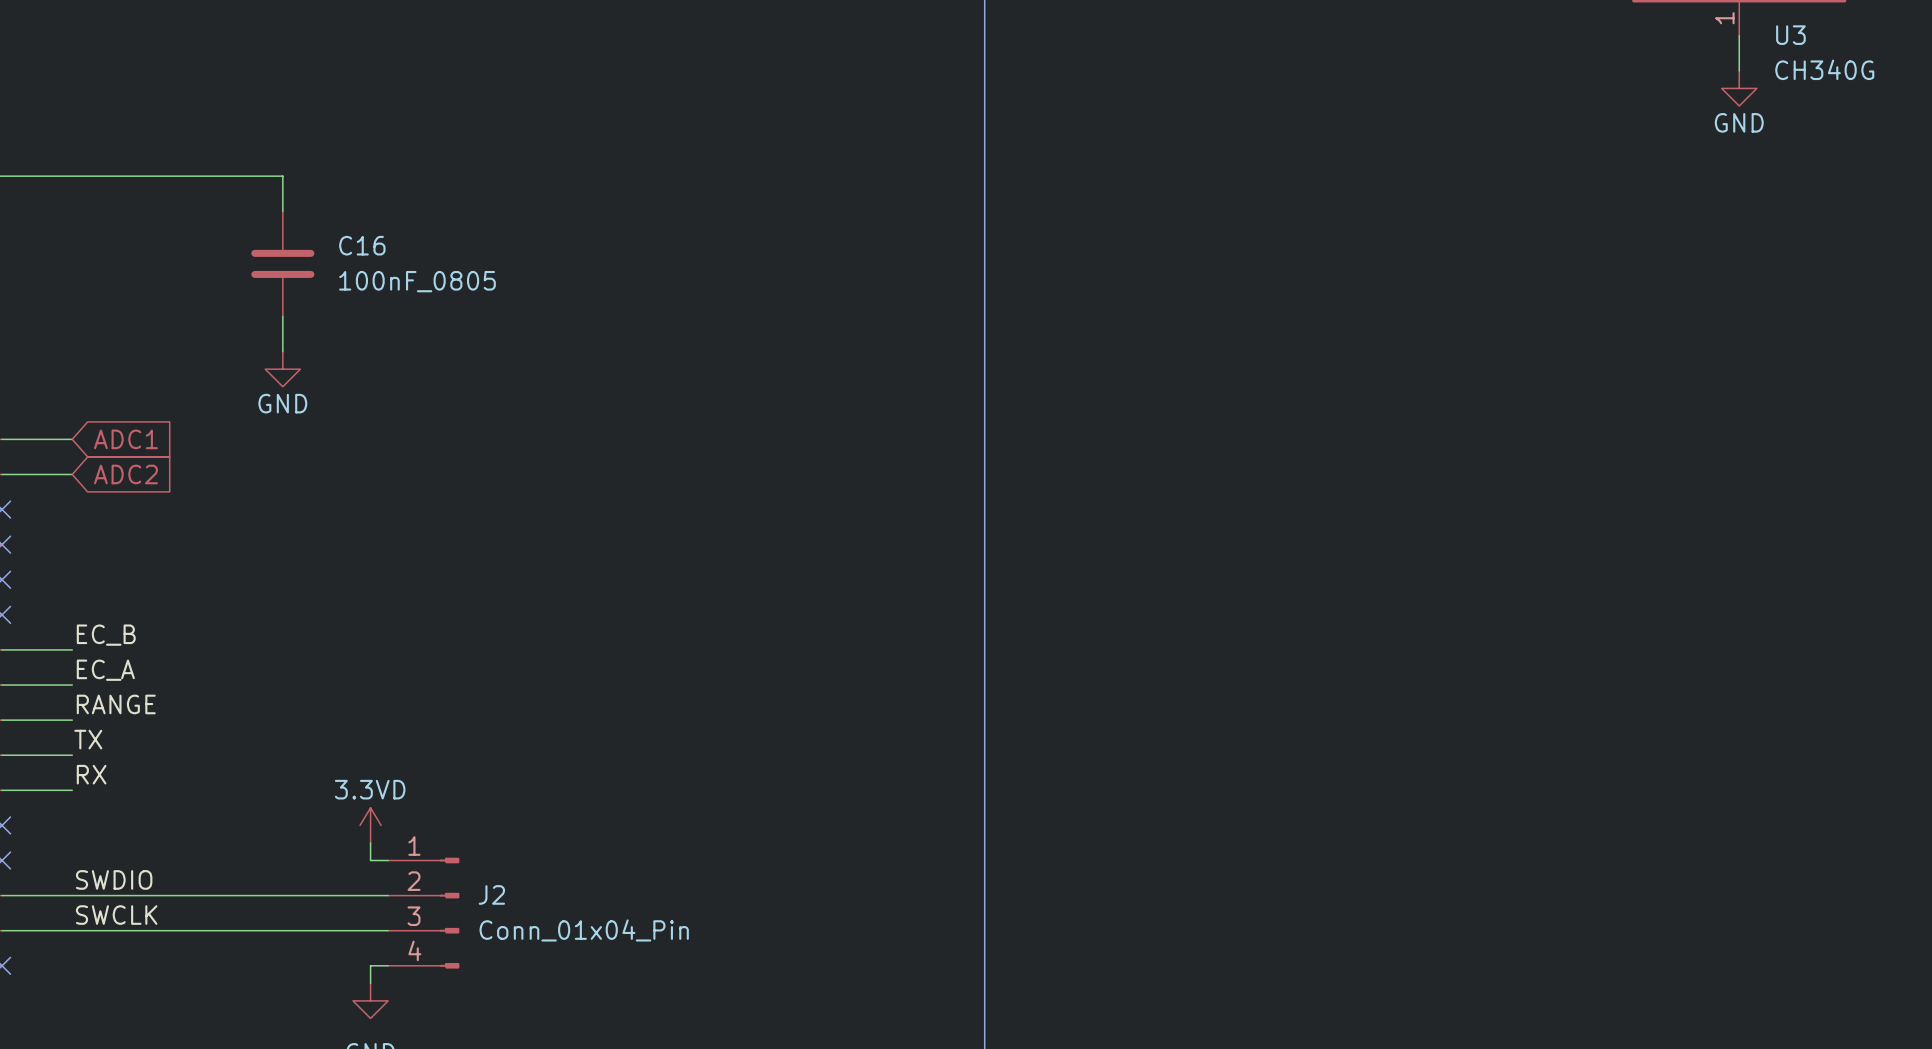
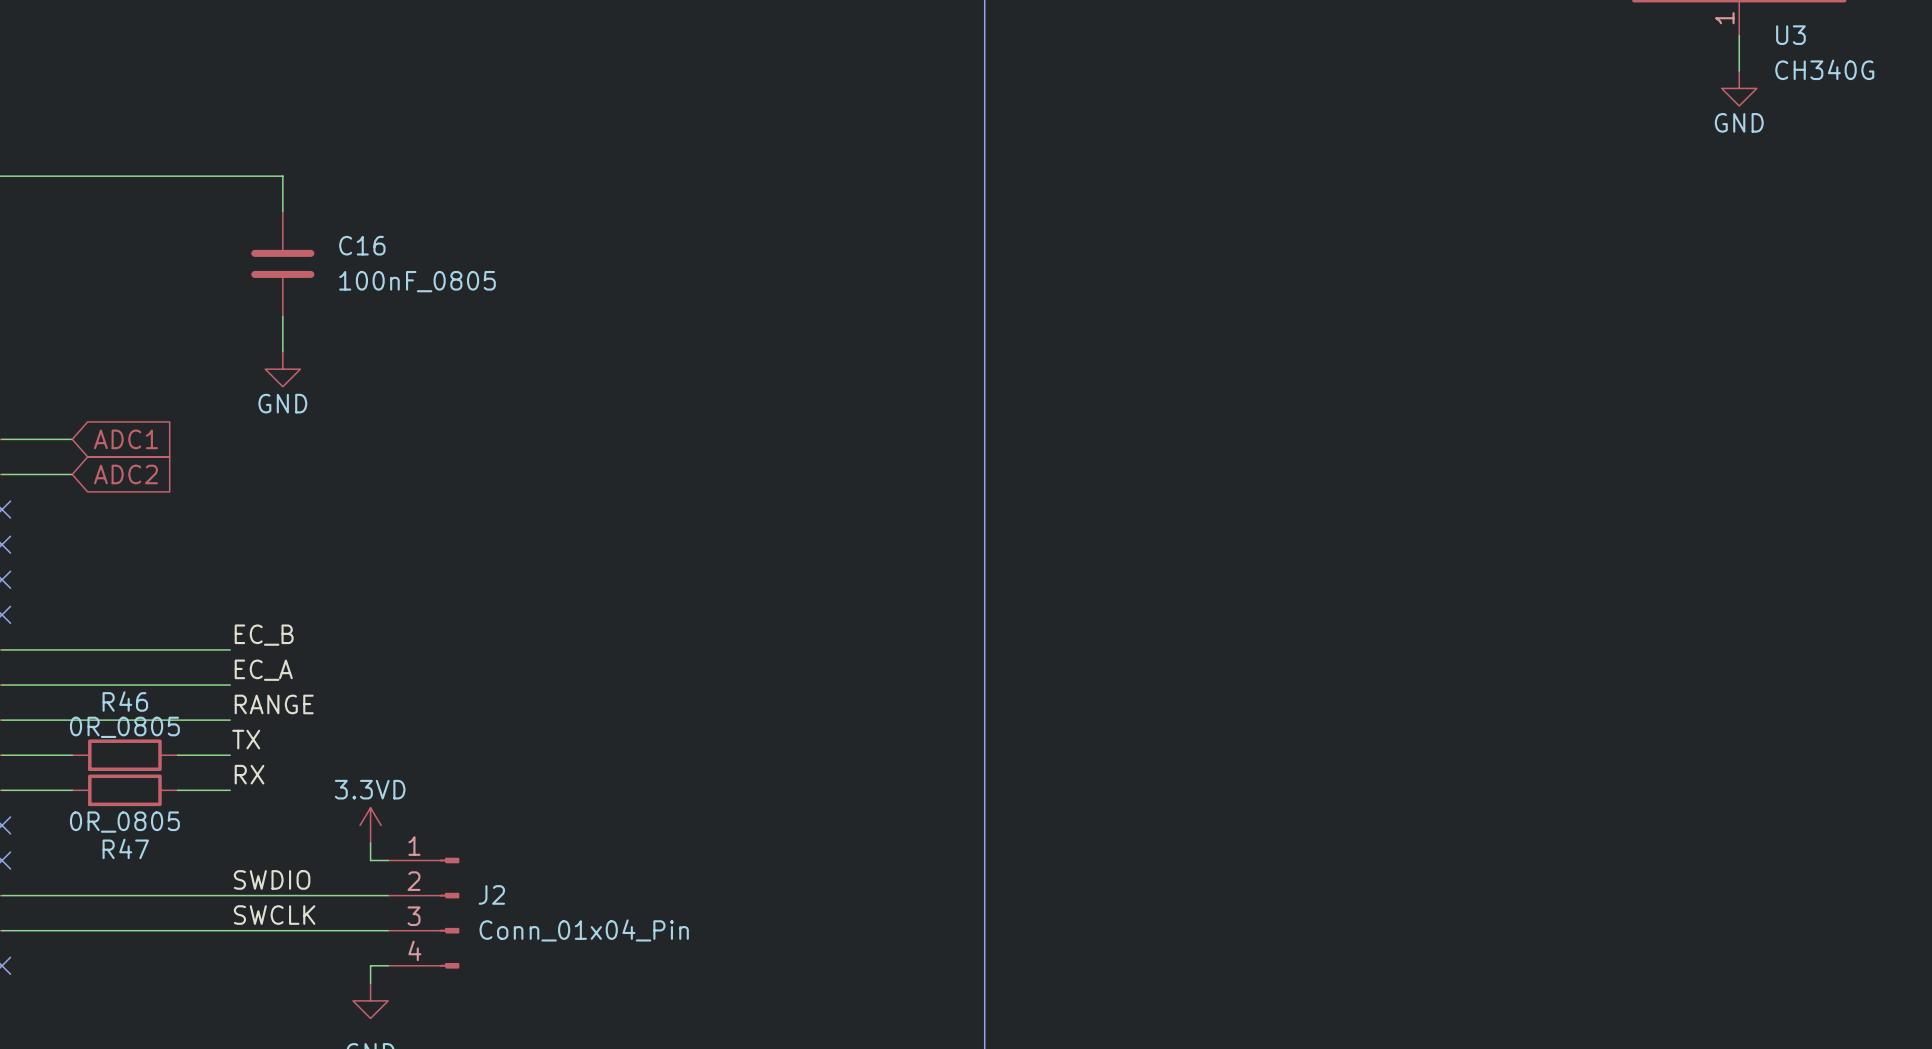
label position: EC_B (106, 635) -> EC_B (264, 635)
wire: none -> (72, 649) (230, 649)
label position: EC_A (105, 670) -> EC_A (263, 670)
wire: none -> (72, 685) (230, 685)
label position: RANGE (116, 704) -> RANGE (274, 704)
wire: none -> (72, 720) (230, 720)
label position: TX (88, 739) -> TX (246, 739)
R46: none -> 0R_0805 (124, 755)
wire: none -> (177, 755) (230, 755)
label position: RX (91, 774) -> RX (249, 774)
R47: none -> 0R_0805 (124, 790)
wire: none -> (177, 790) (230, 790)
label position: SWDIO (114, 879) -> SWDIO (272, 879)
label position: SWCLK (116, 915) -> SWCLK (274, 915)

